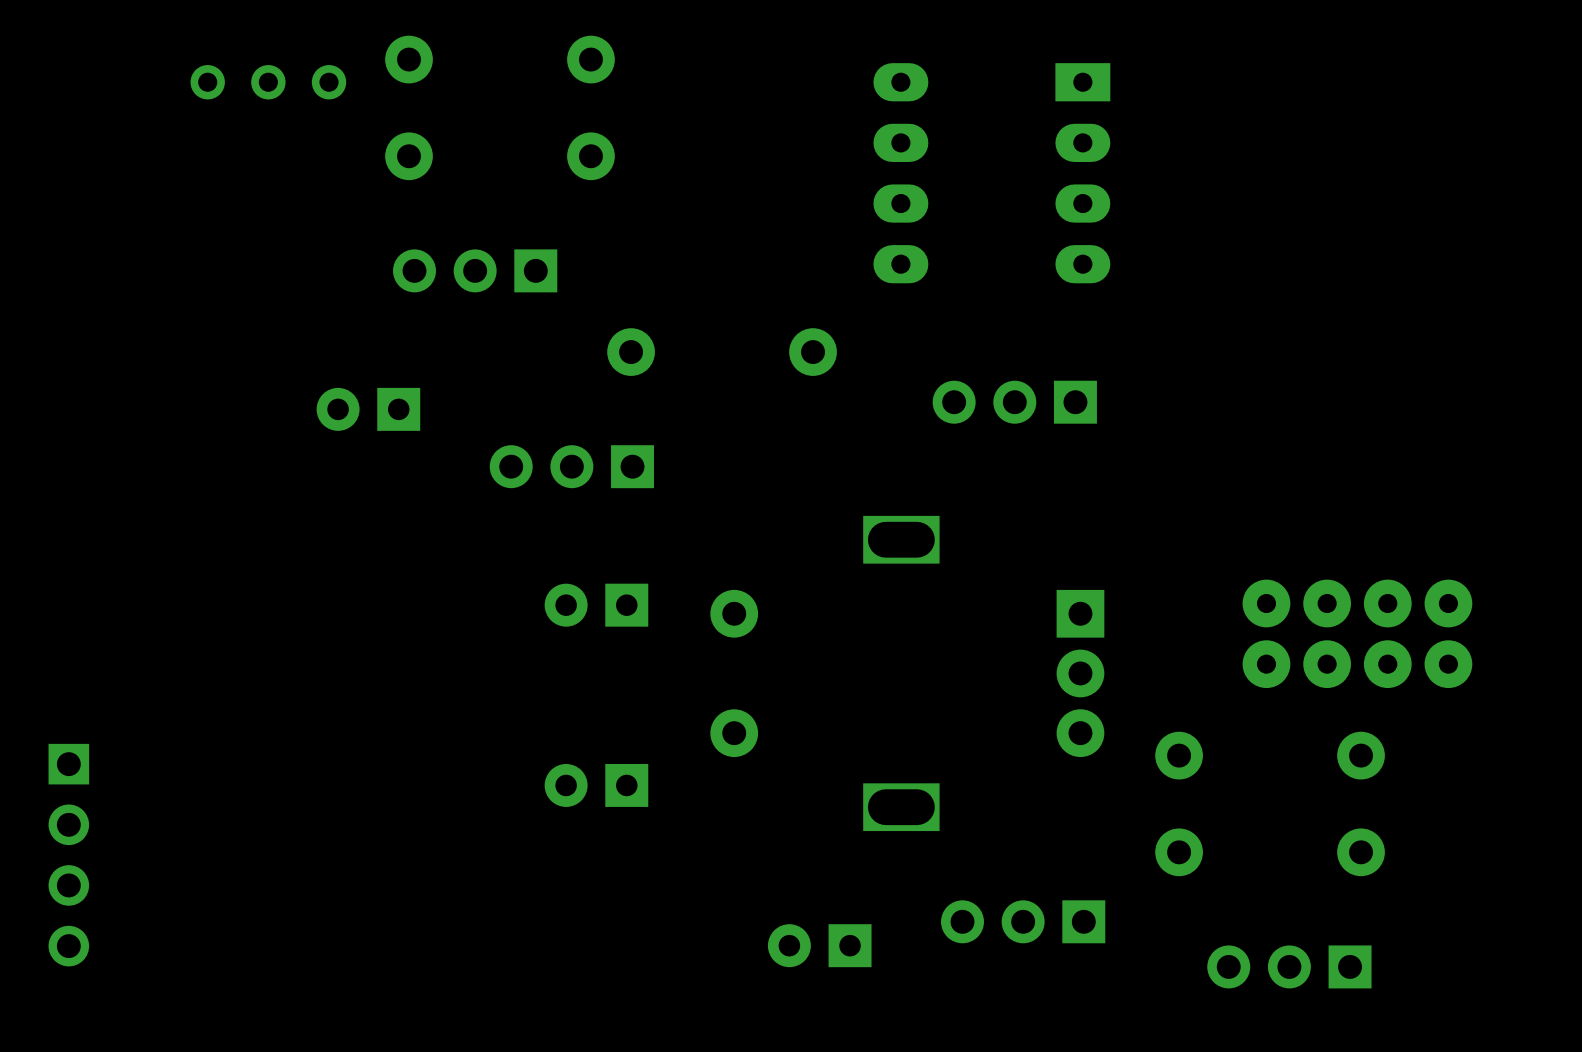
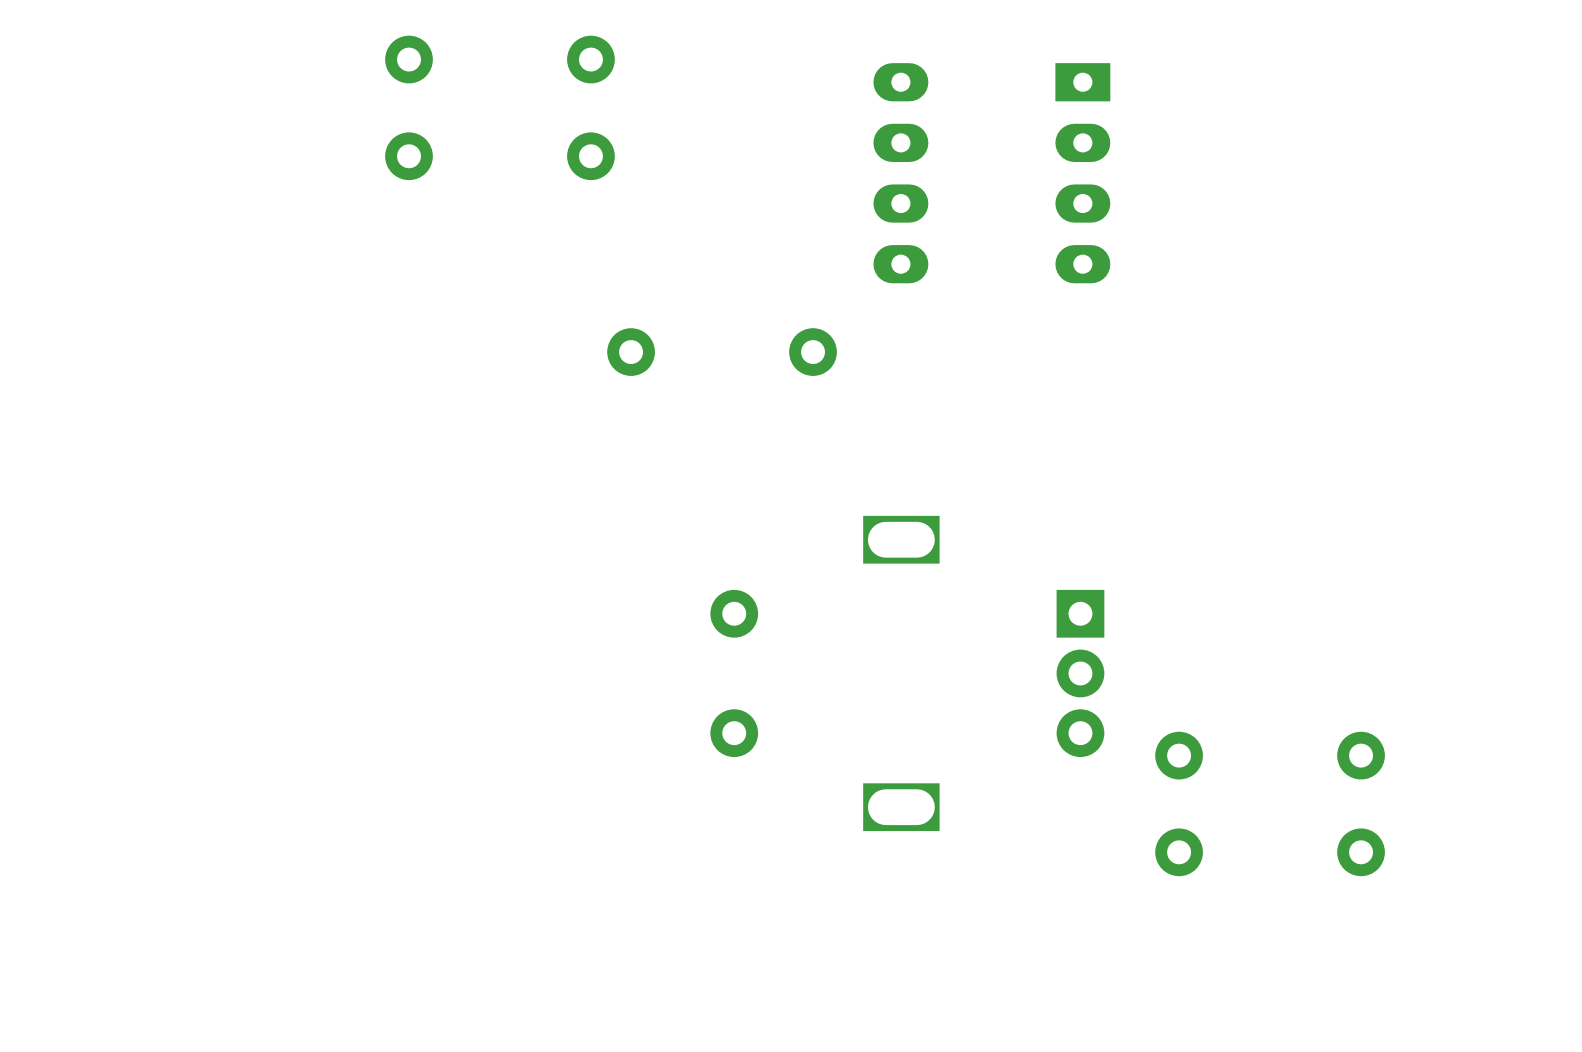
part: (268, 82) -> none
part: (475, 270) -> none
part: (1014, 402) -> none
part: (368, 409) -> none
part: (571, 466) -> none
part: (596, 605) -> none
part: (1357, 633) -> none
part: (596, 785) -> none
part: (68, 855) -> none
part: (1023, 921) -> none
part: (819, 945) -> none
part: (1289, 966) -> none

